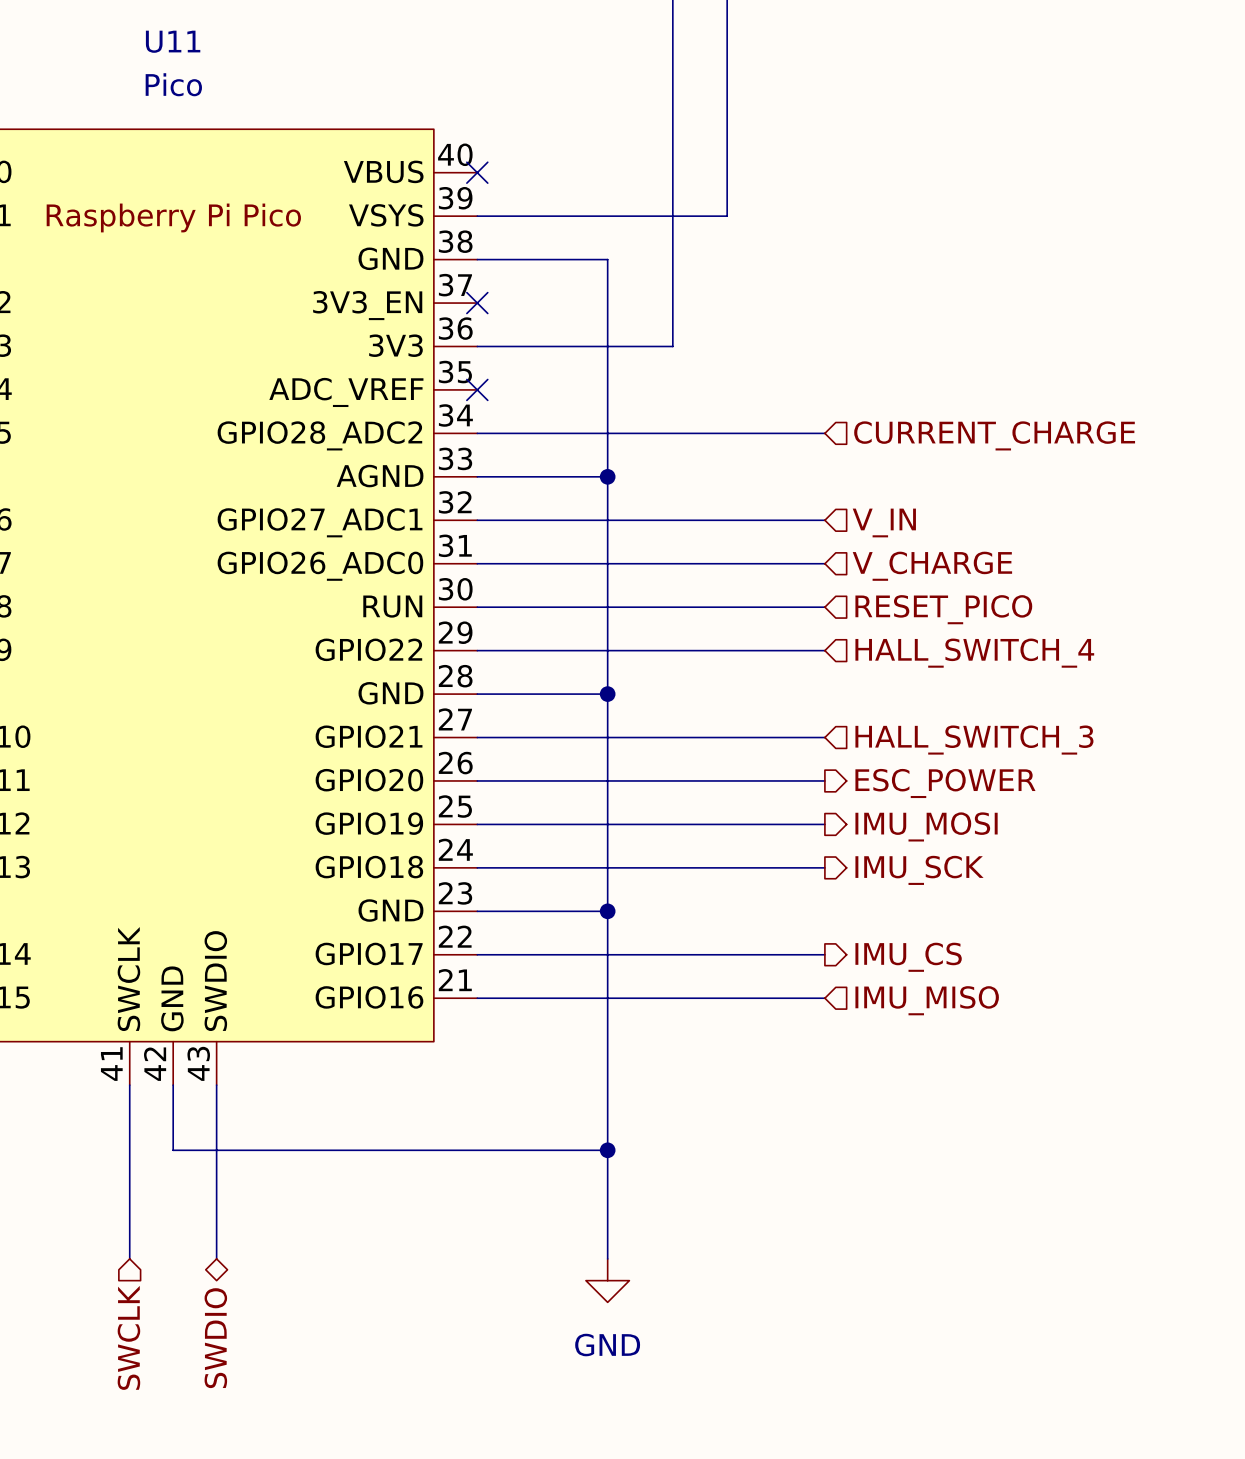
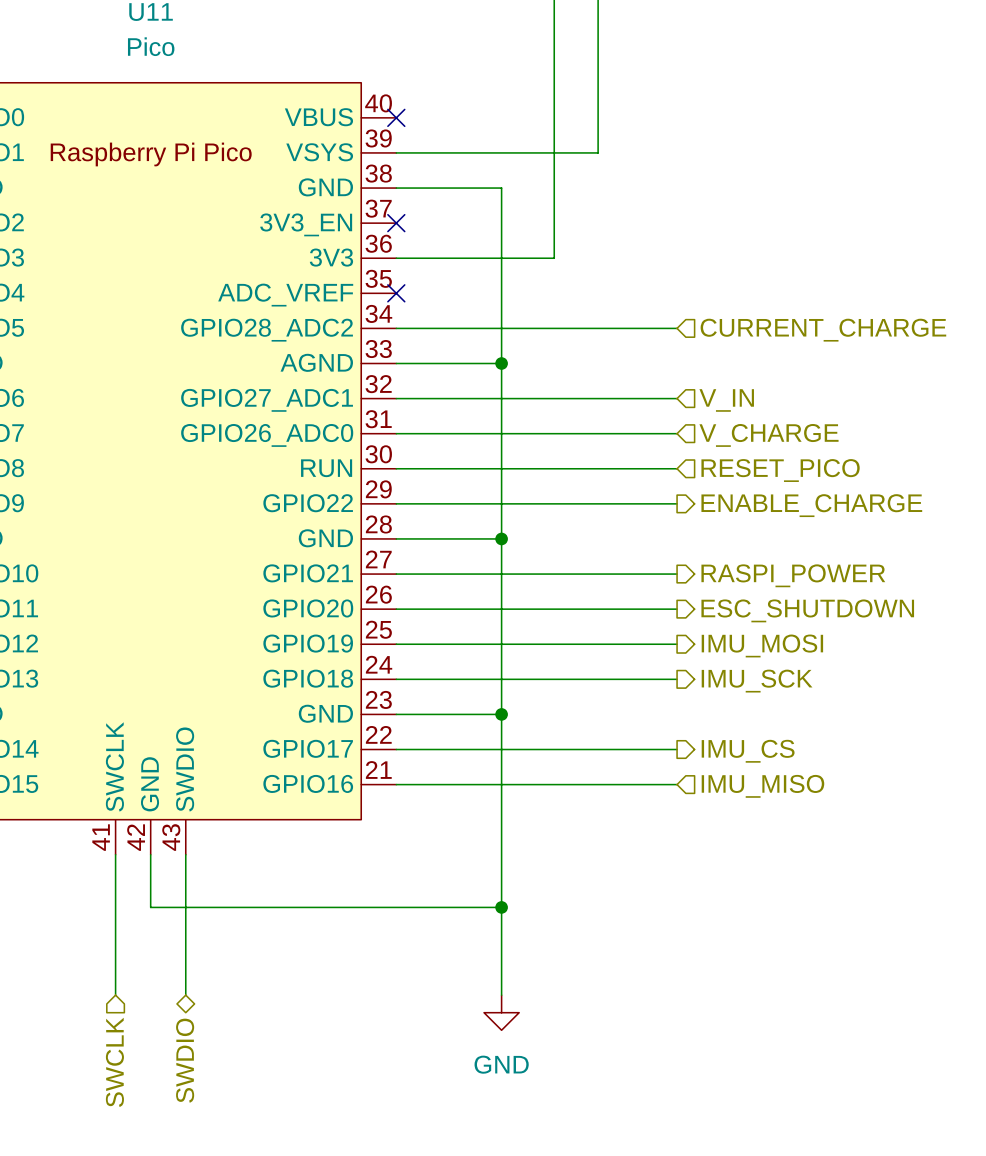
hierarchical label shape: input (974, 653) -> output (811, 505)
hierarchical label: HALL_SWITCH_4 (974, 653) -> ENABLE_CHARGE (811, 505)
hierarchical label shape: input (974, 740) -> output (793, 575)
hierarchical label: HALL_SWITCH_3 (974, 740) -> RASPI_POWER (793, 575)
hierarchical label: ESC_POWER (945, 783) -> ESC_SHUTDOWN (807, 610)

